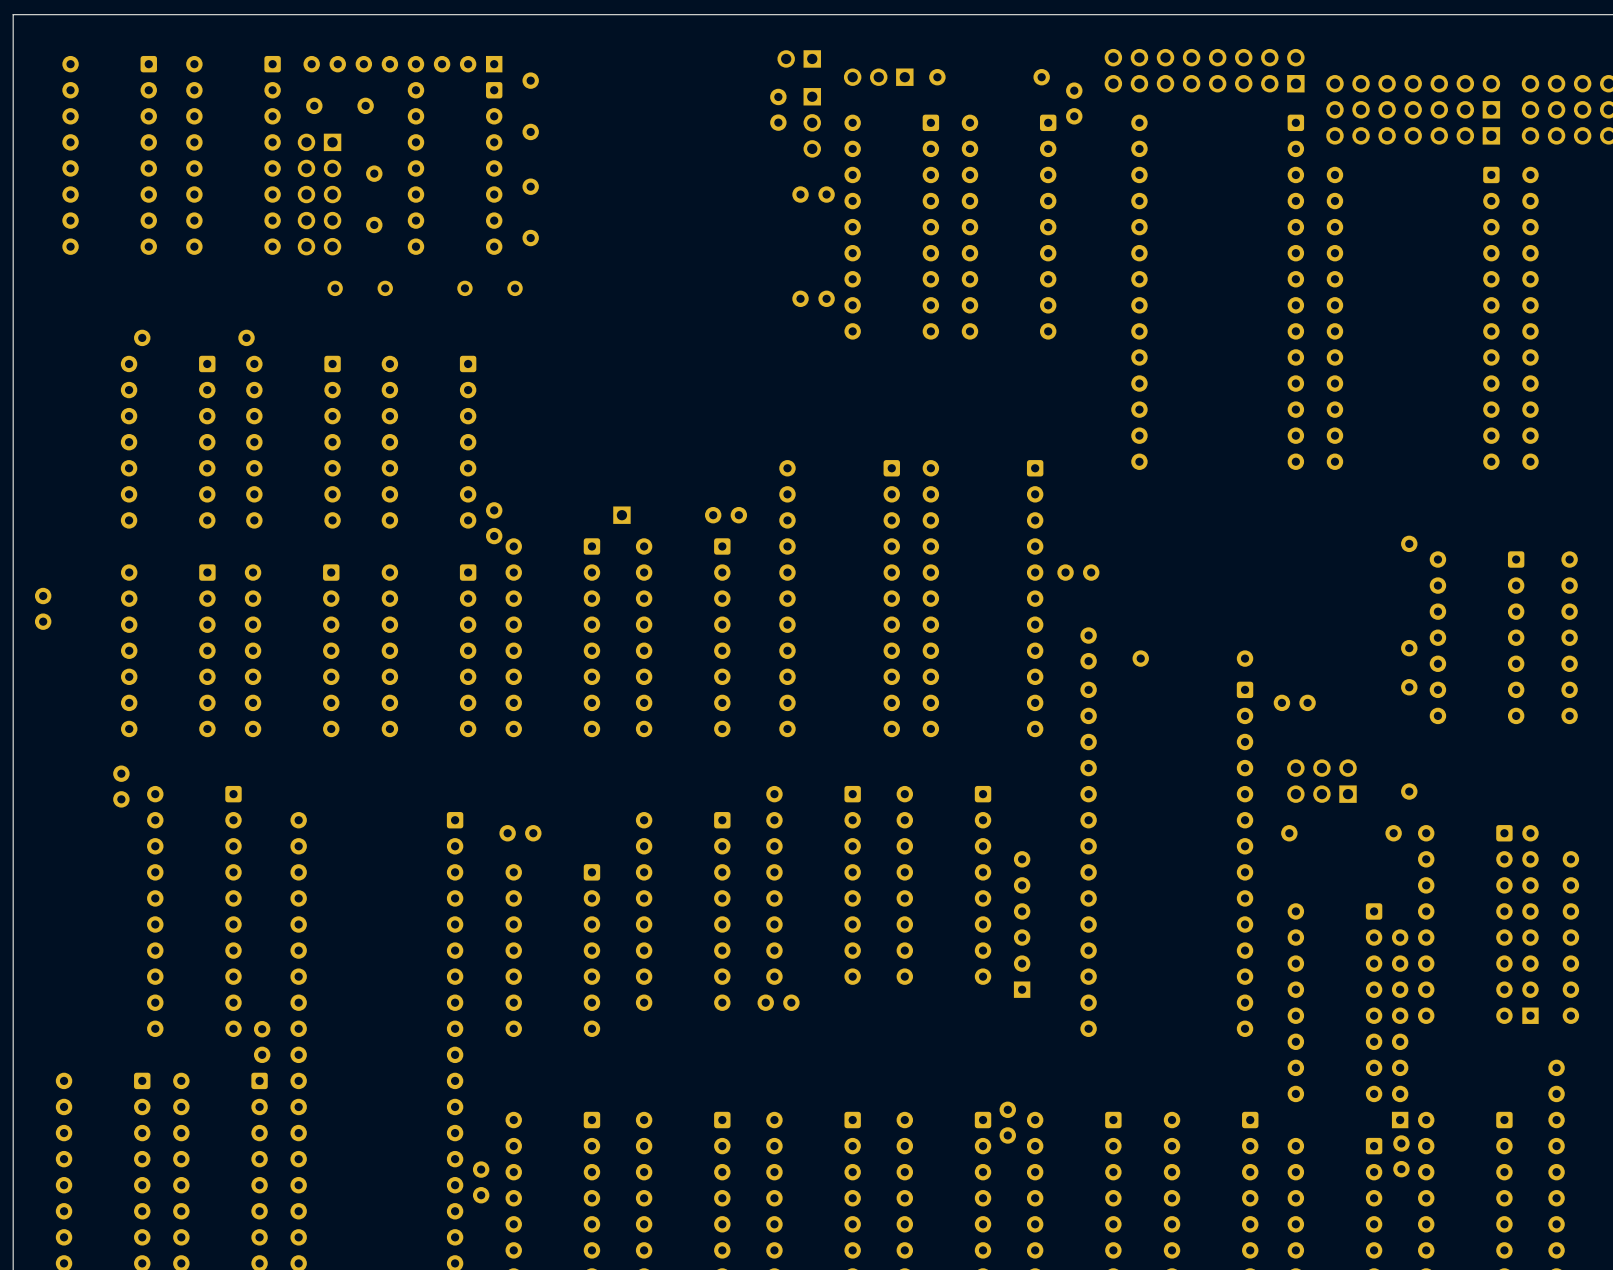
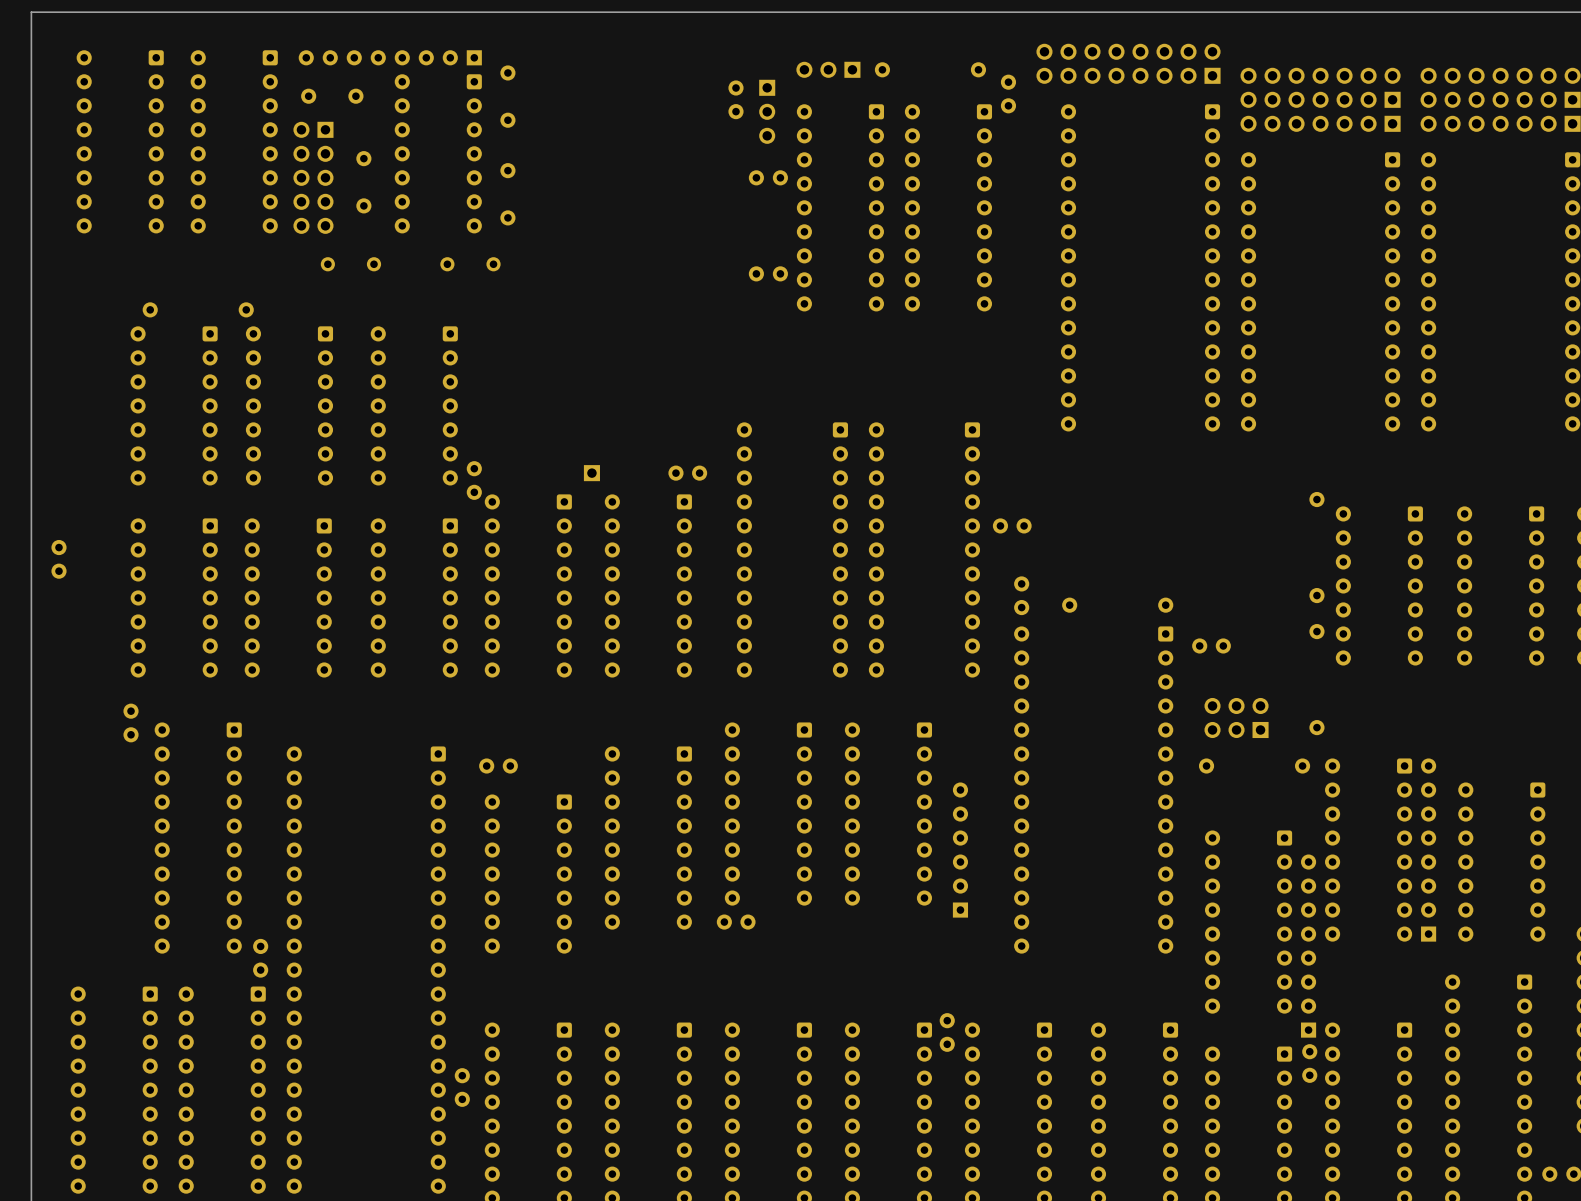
part: (799, 58) -> none

